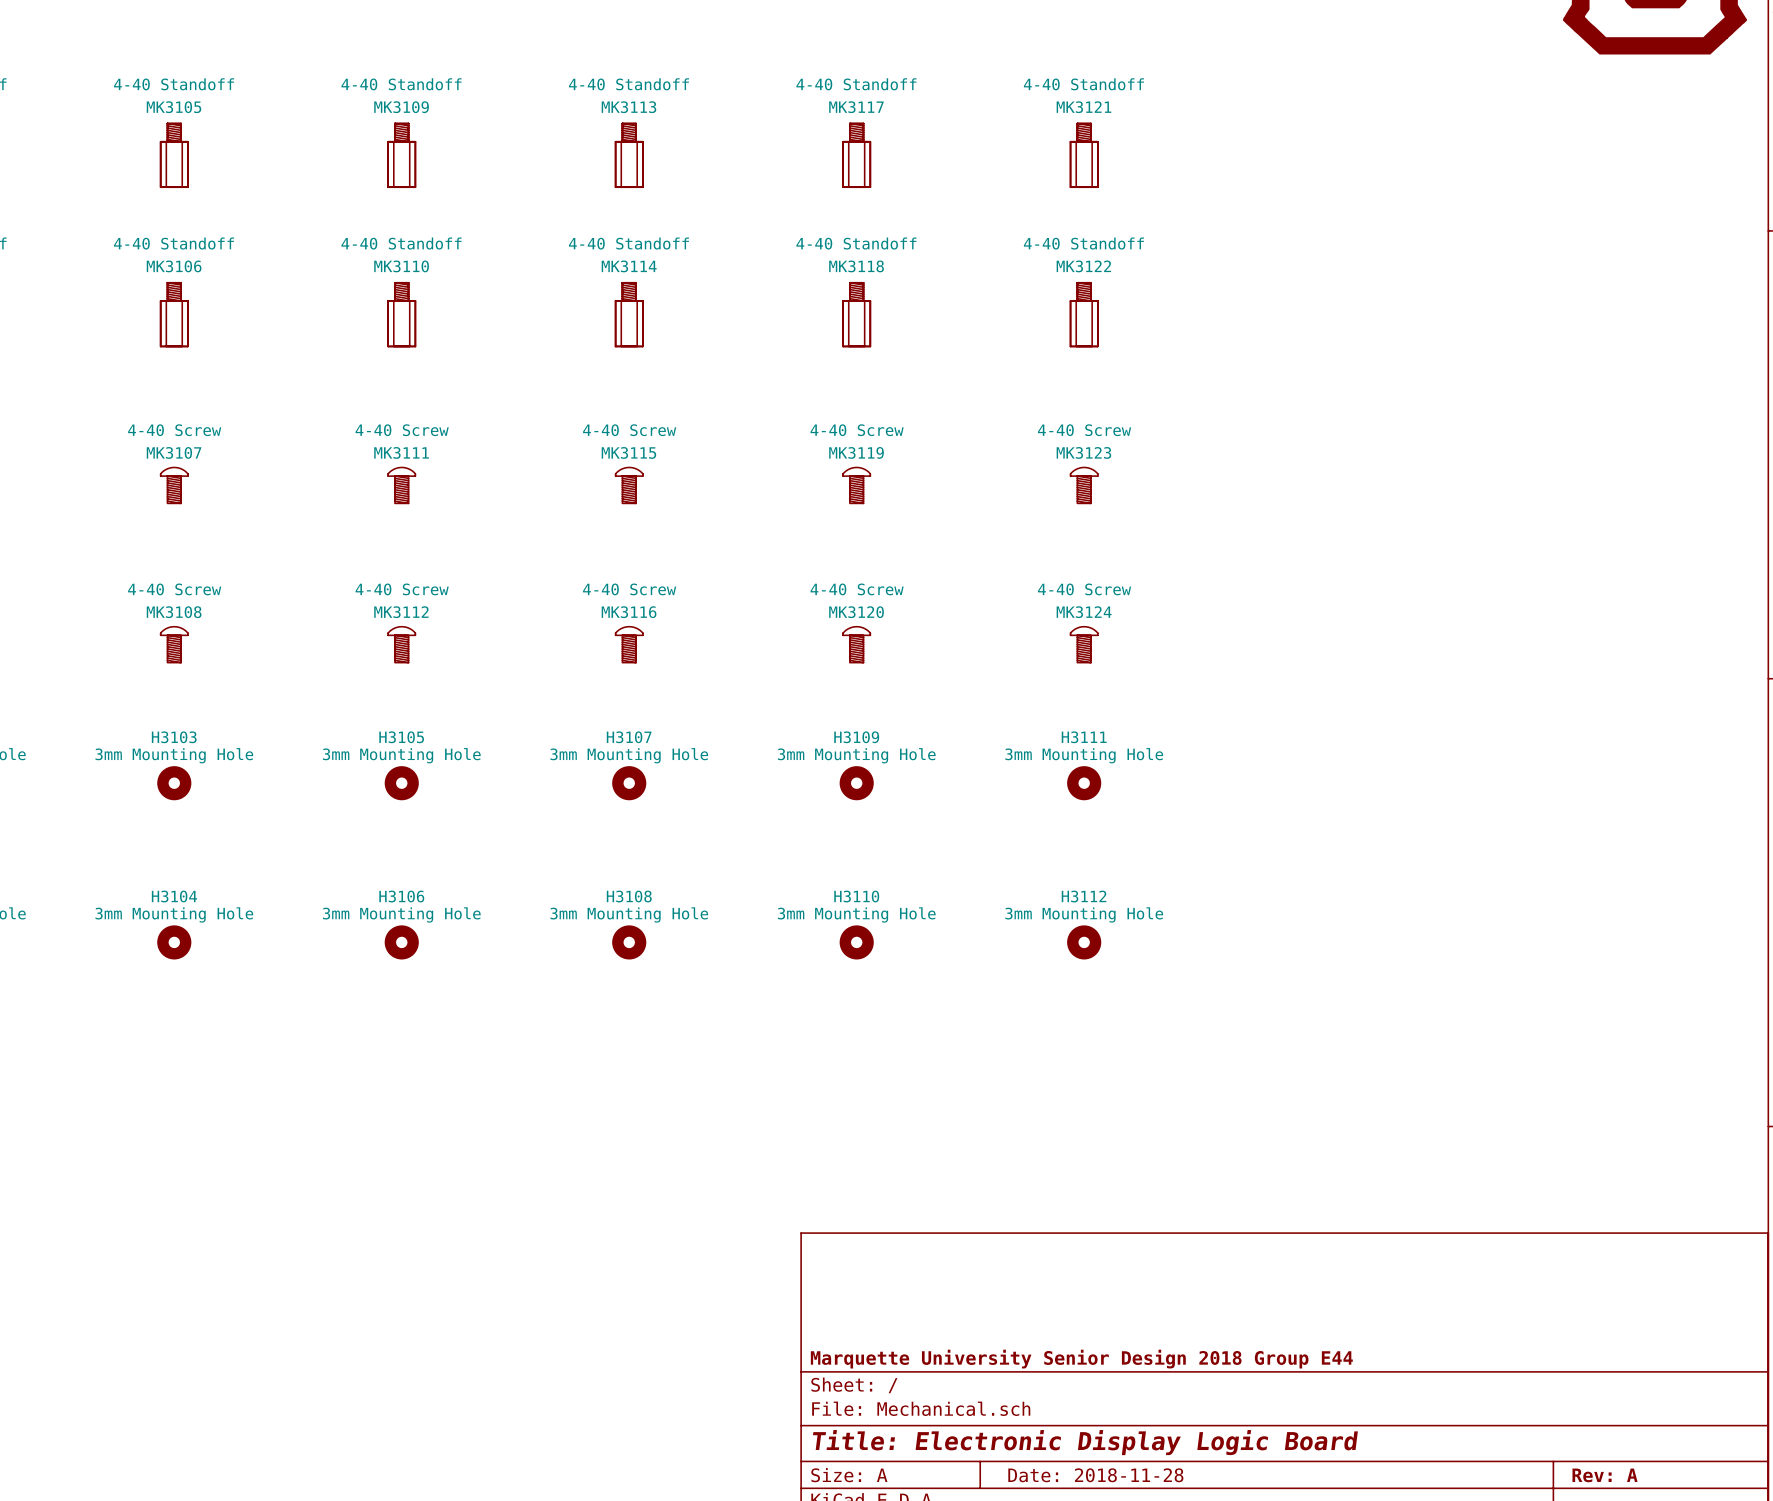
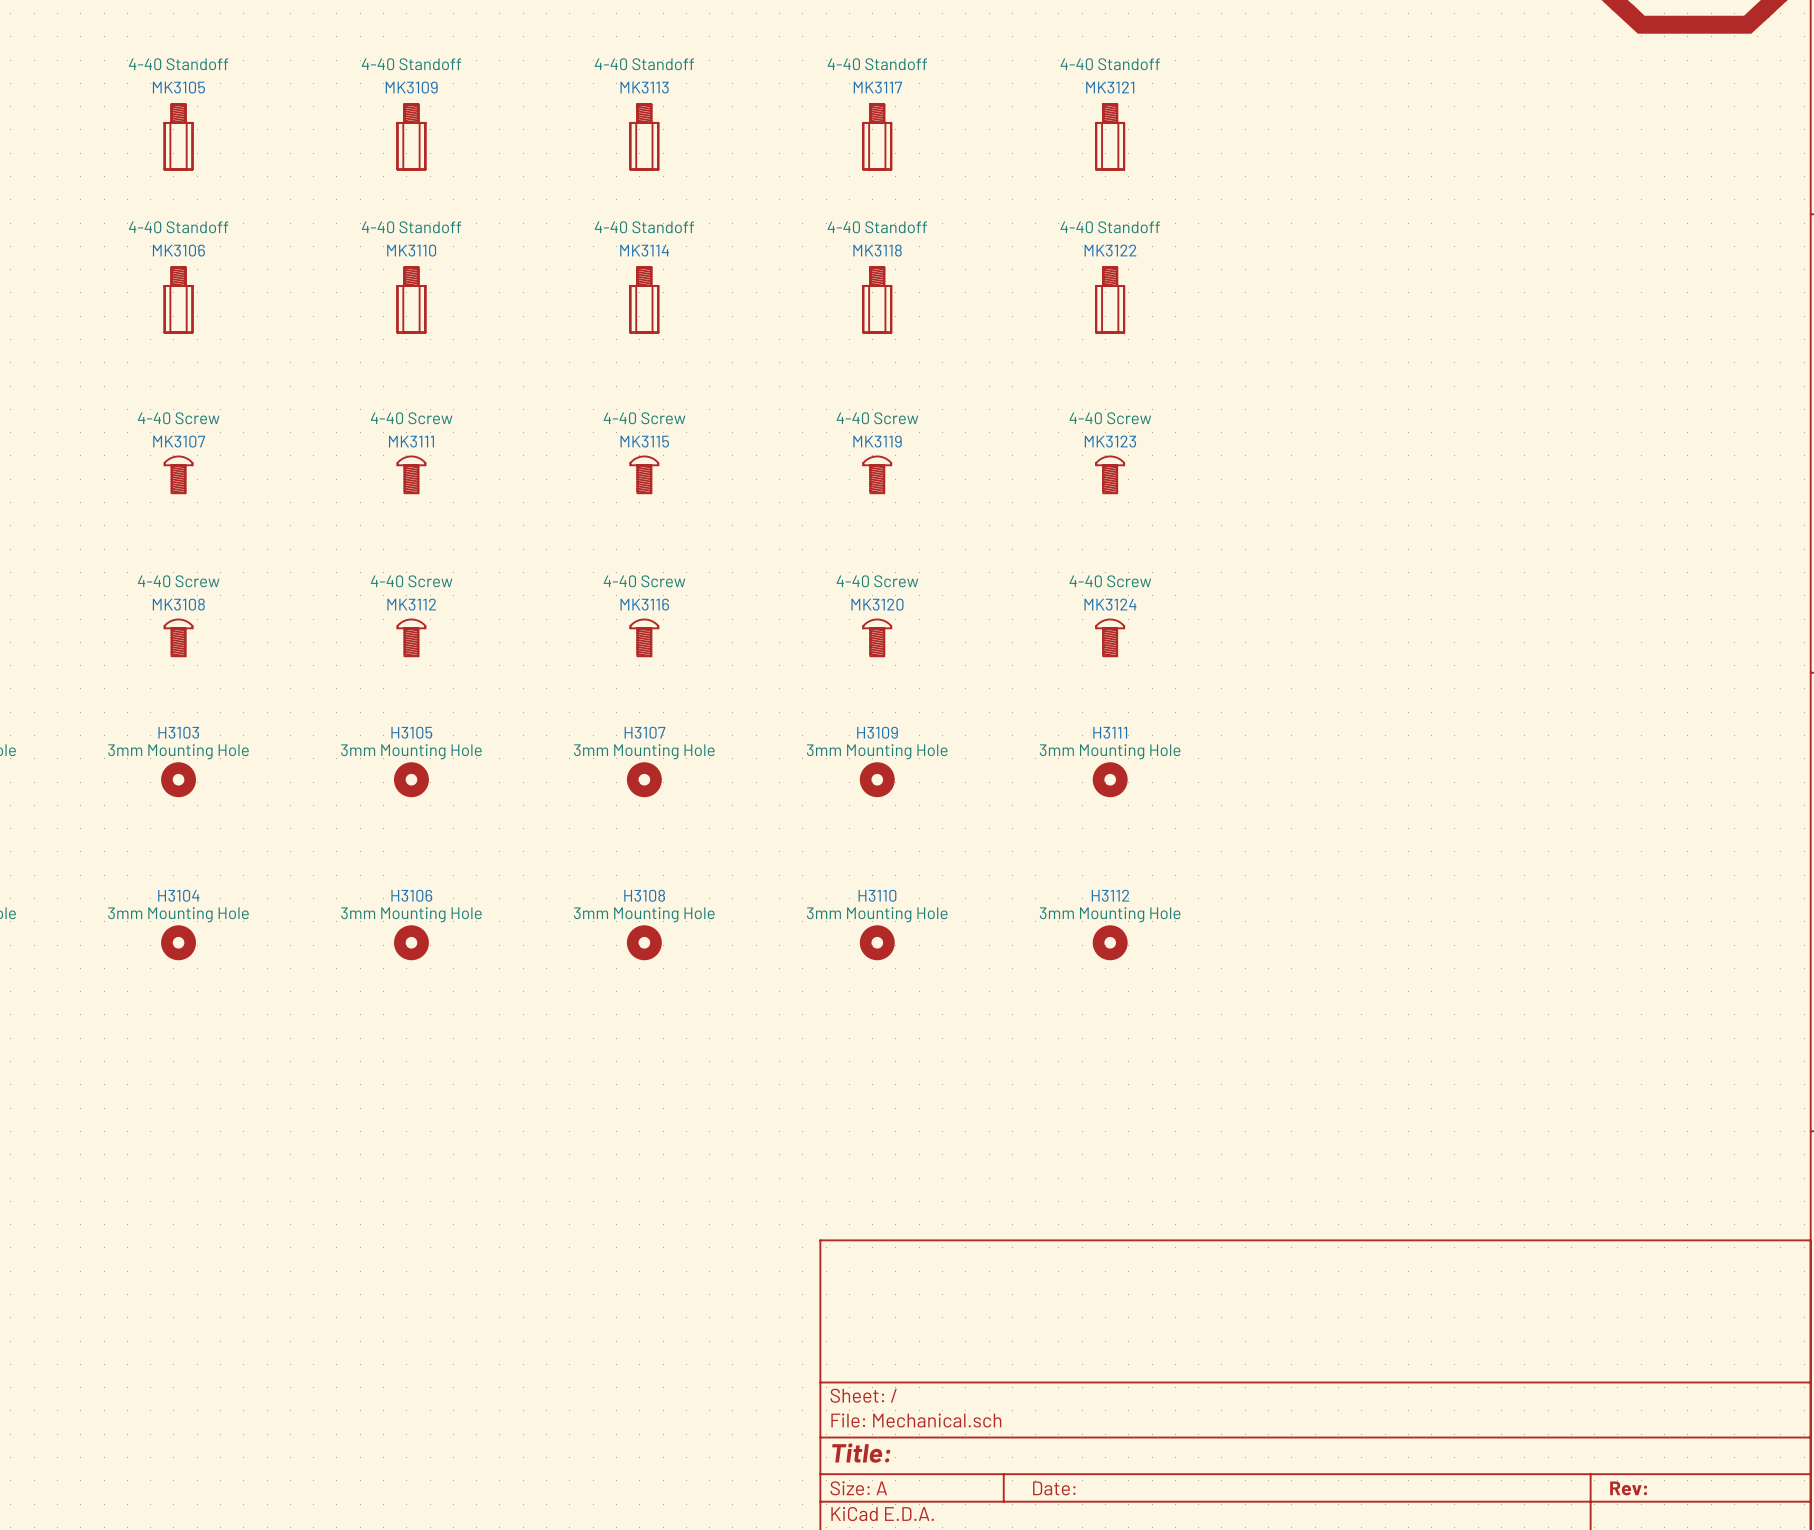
title block: Marquette University Senior Design 2018 Group E44 (1081, 1359) -> none
title block: Title: Electronic Display Logic Board (1085, 1442) -> Title: (861, 1453)
title block: Date: 2018-11-28 (1095, 1475) -> Date: (1054, 1488)
title block: Rev: A (1605, 1475) -> Rev: (1628, 1488)

